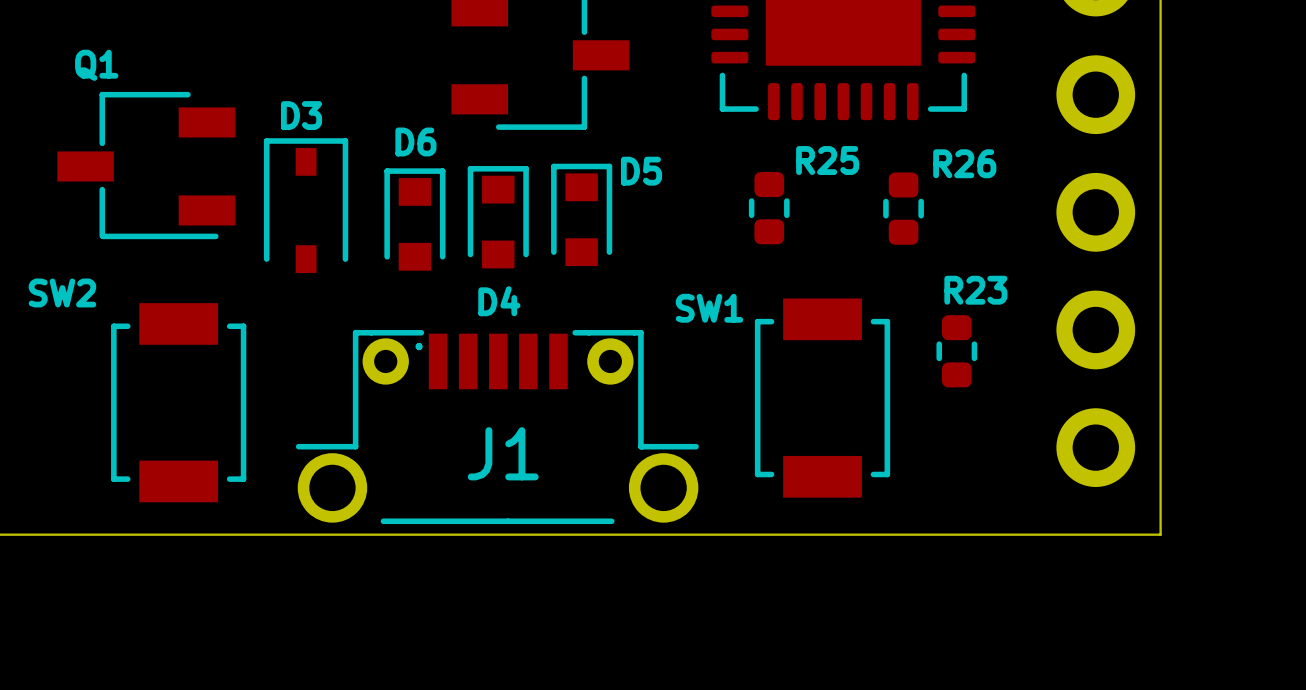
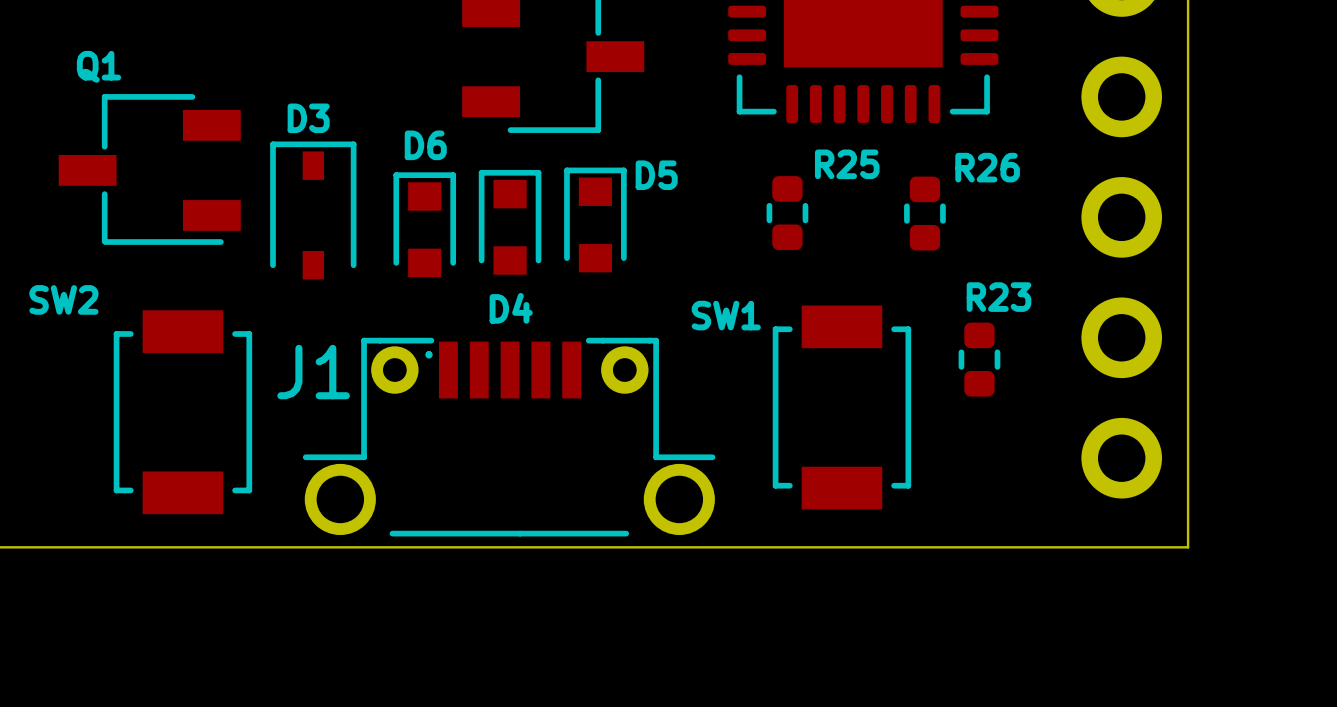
J1 name position: J1 (503, 453) -> J1 (313, 372)

